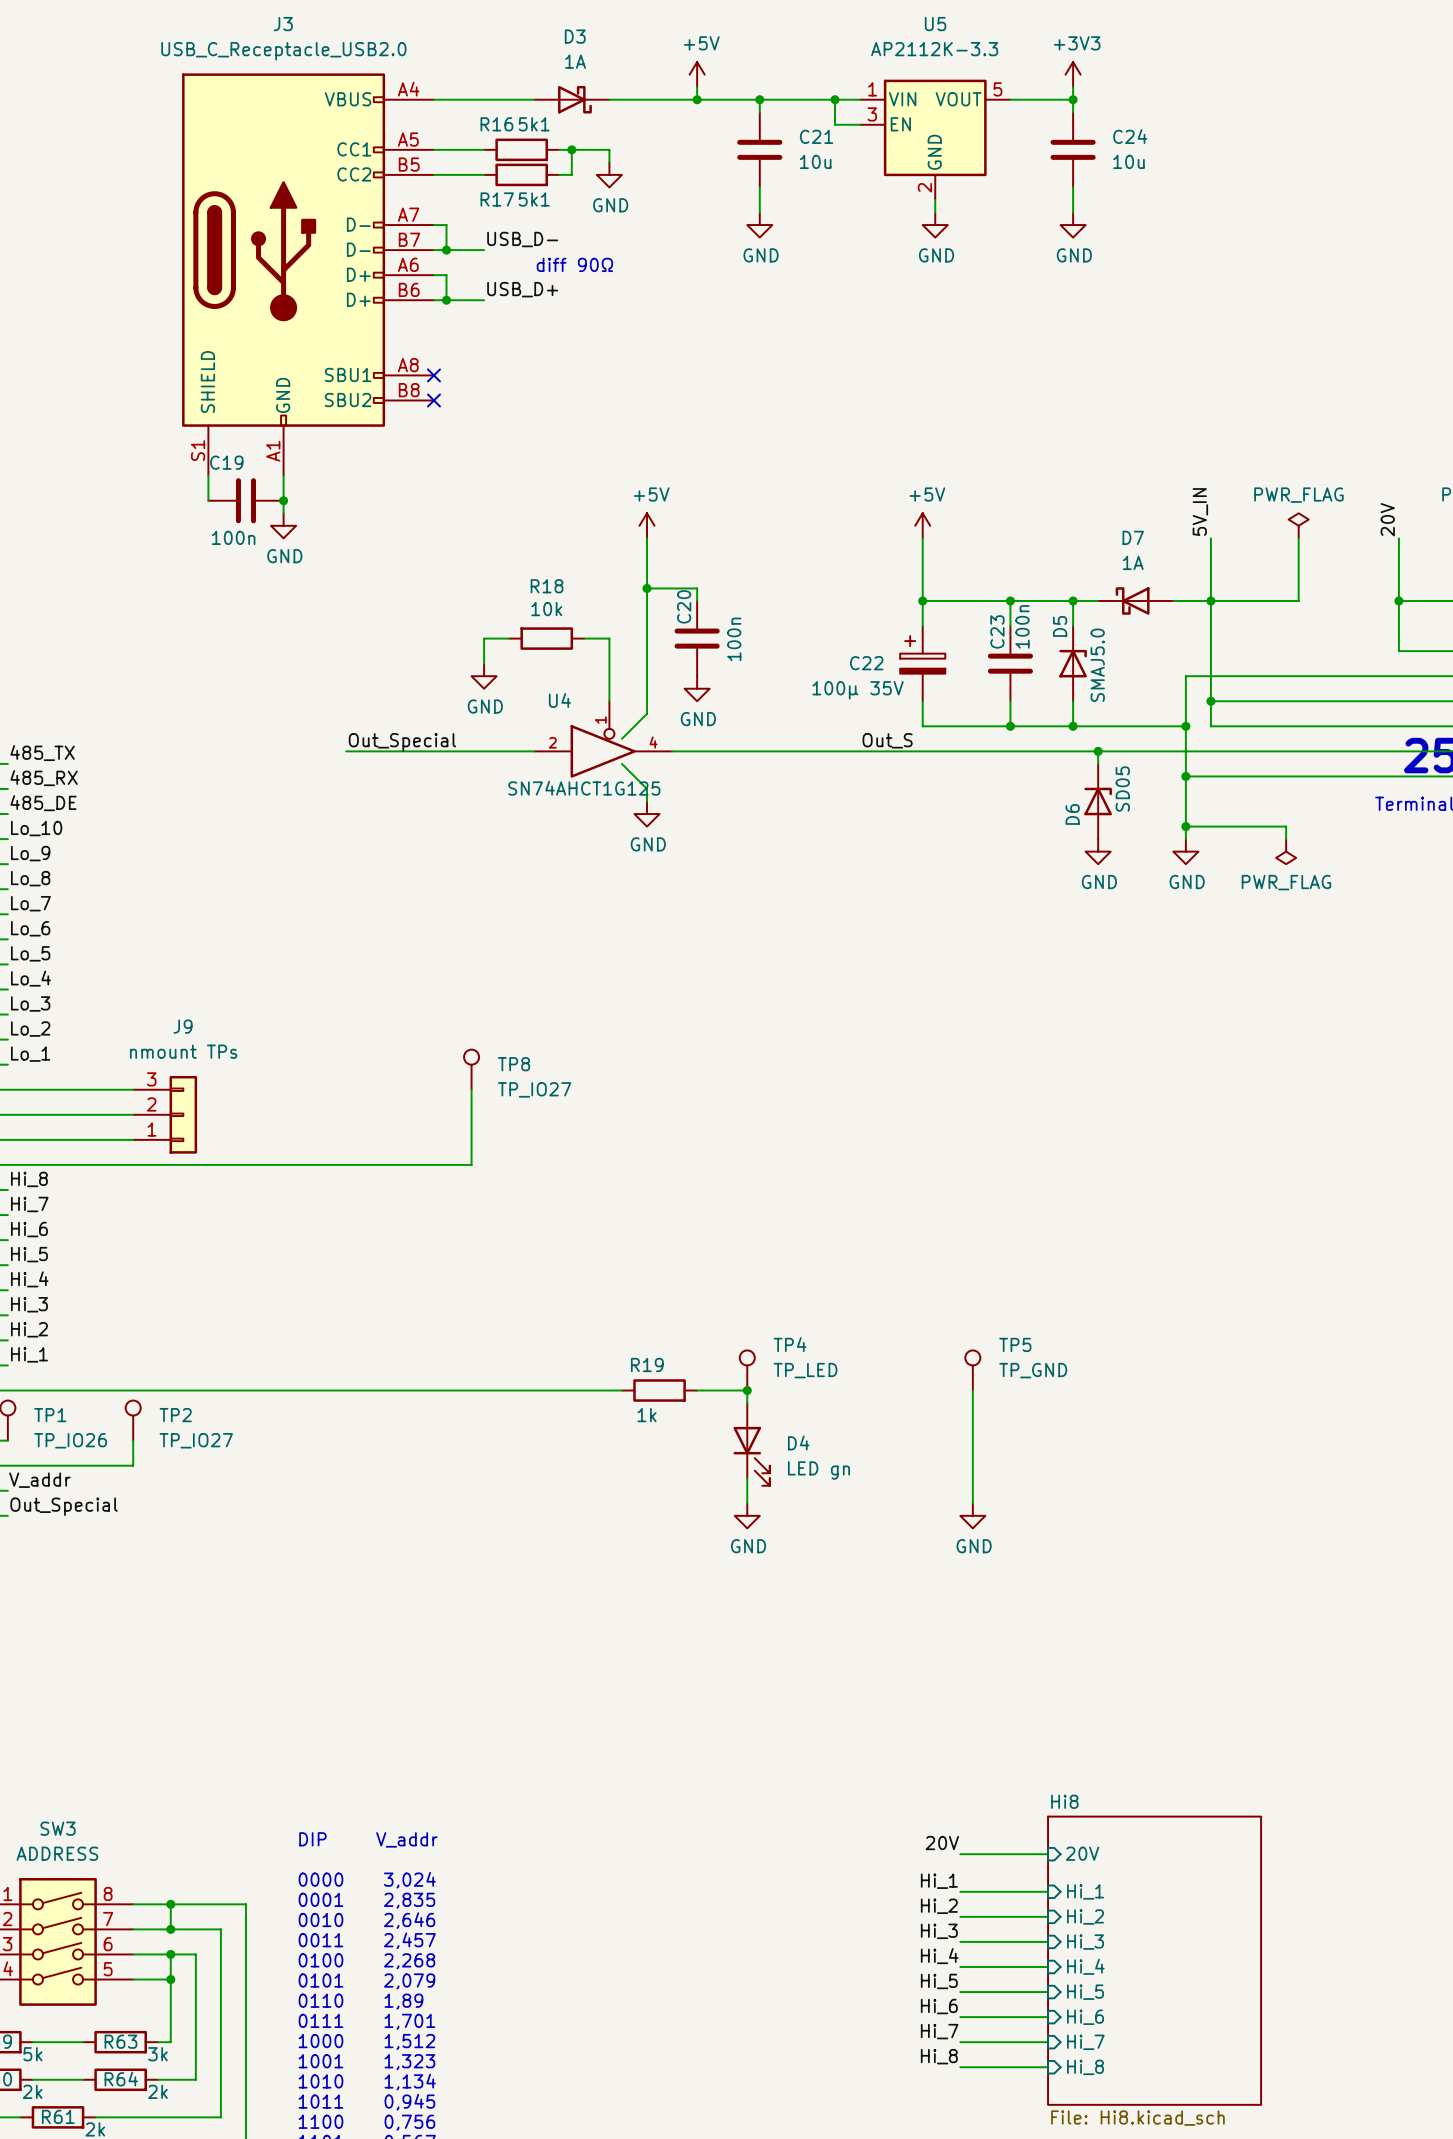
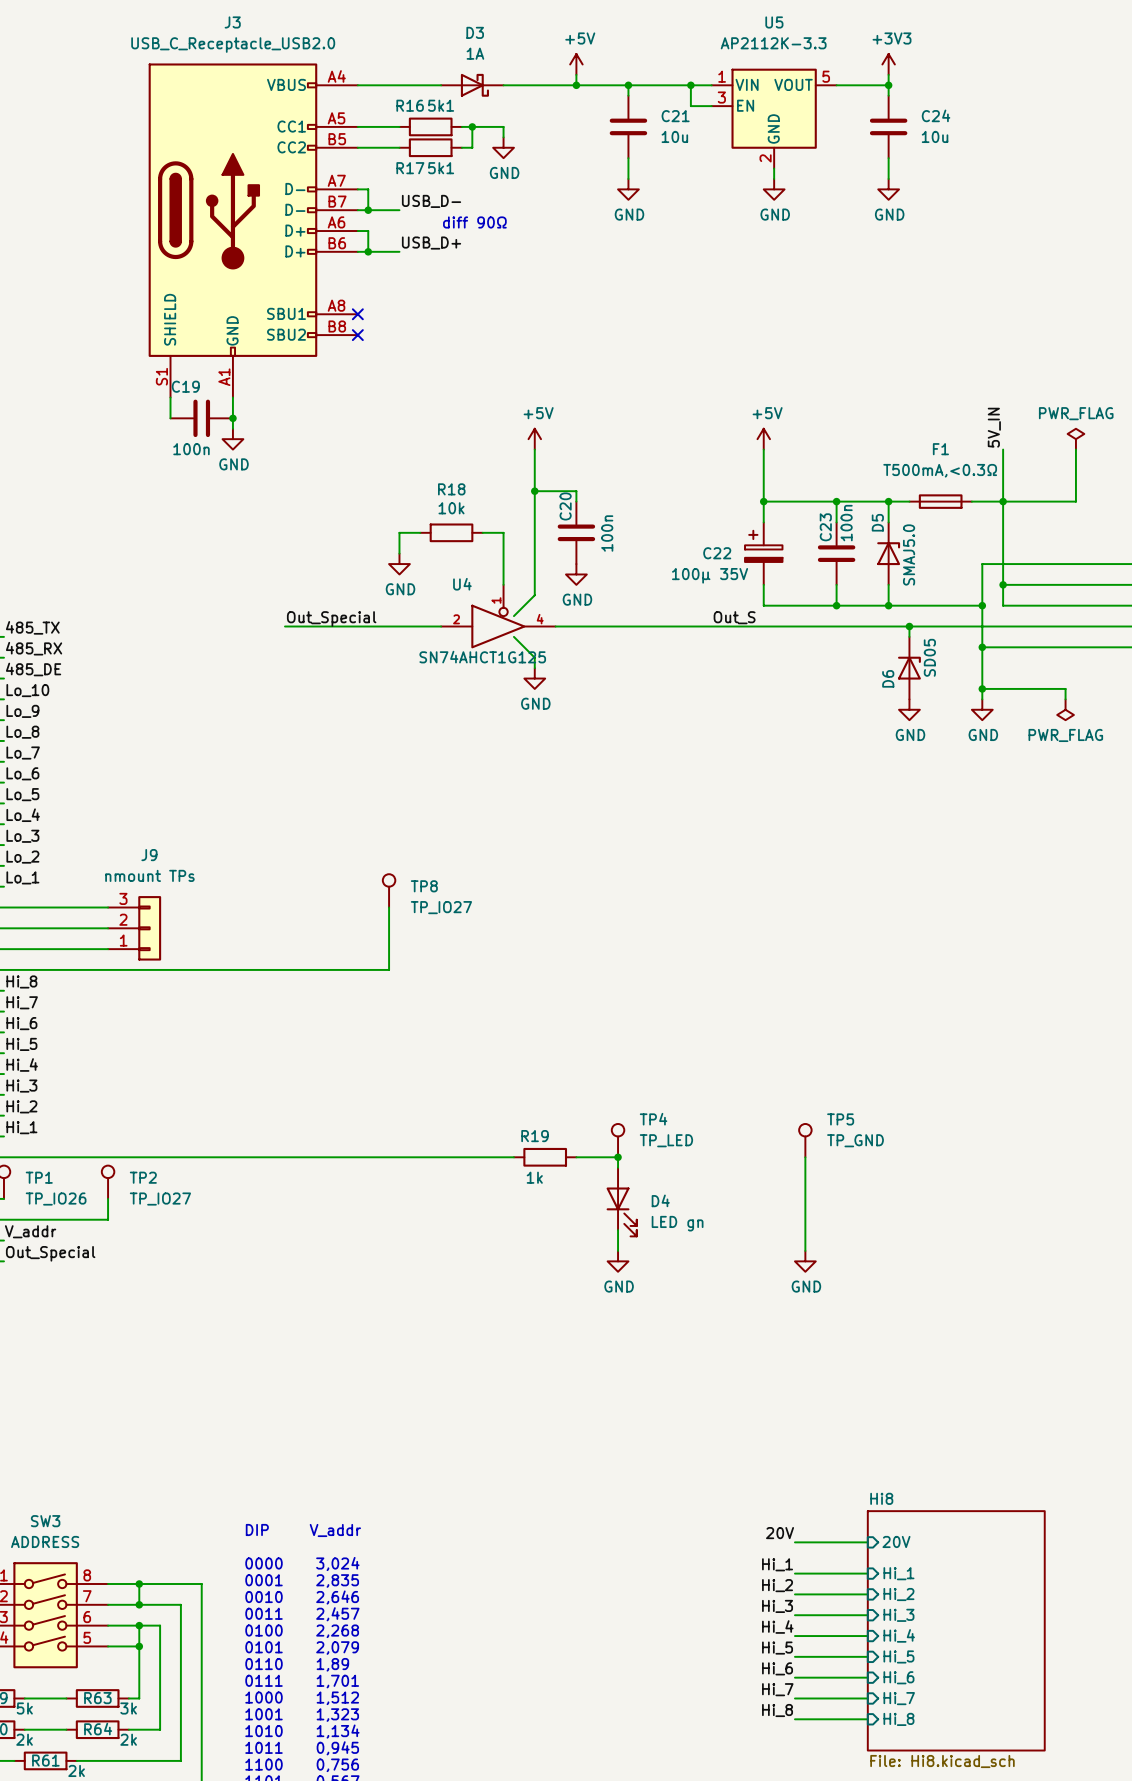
D7: 1A (1135, 601) -> none
F1: none -> T500mA,<0.3Ω (940, 501)

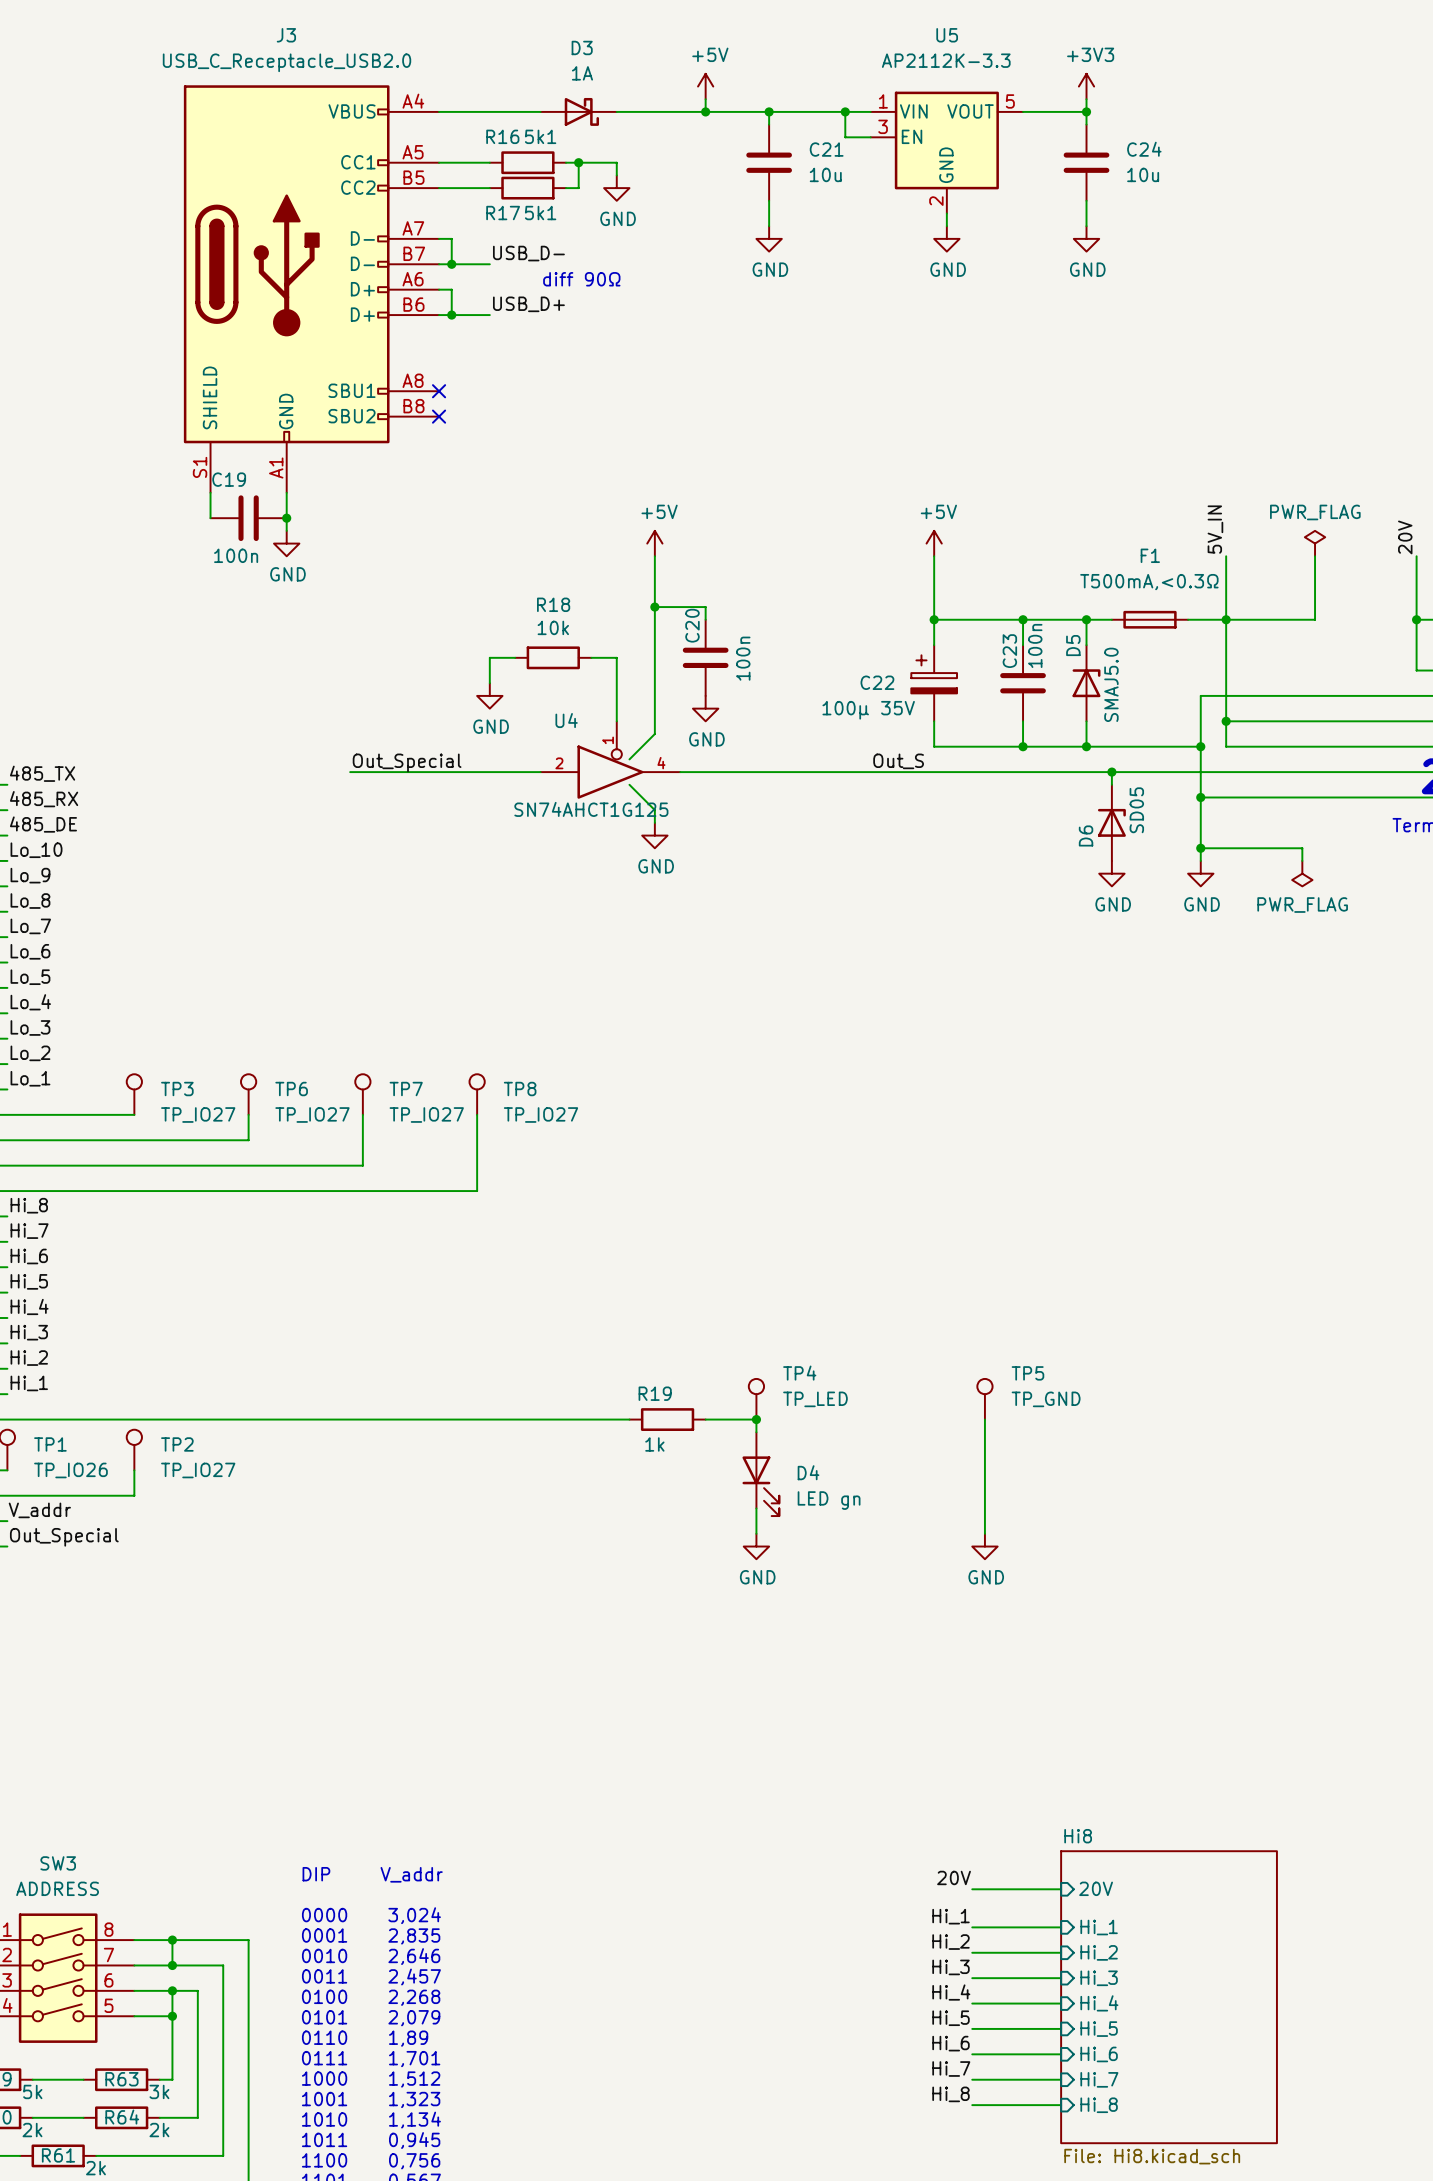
TP3: none -> TP_IO27 (134, 1094)
TP6: none -> TP_IO27 (248, 1094)
TP7: none -> TP_IO27 (362, 1094)
wire: none -> (248, 1114) (248, 1140) (134, 1140)
wire: none -> (362, 1114) (362, 1165) (134, 1165)
J9: nmount TPs (134, 928) -> none

